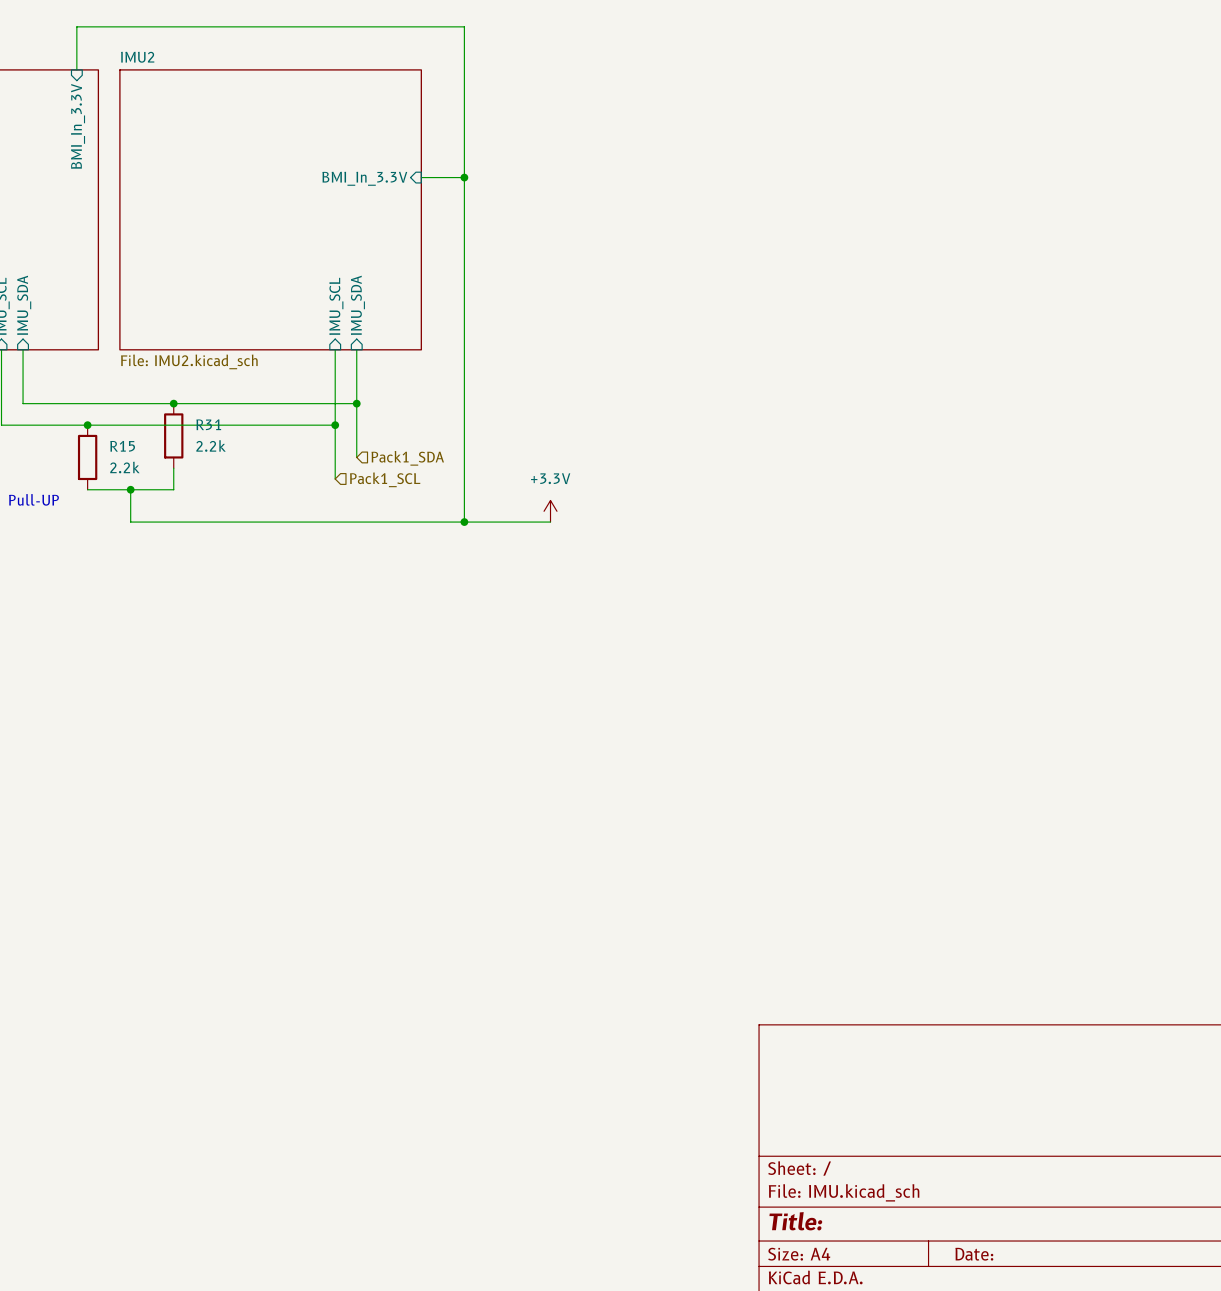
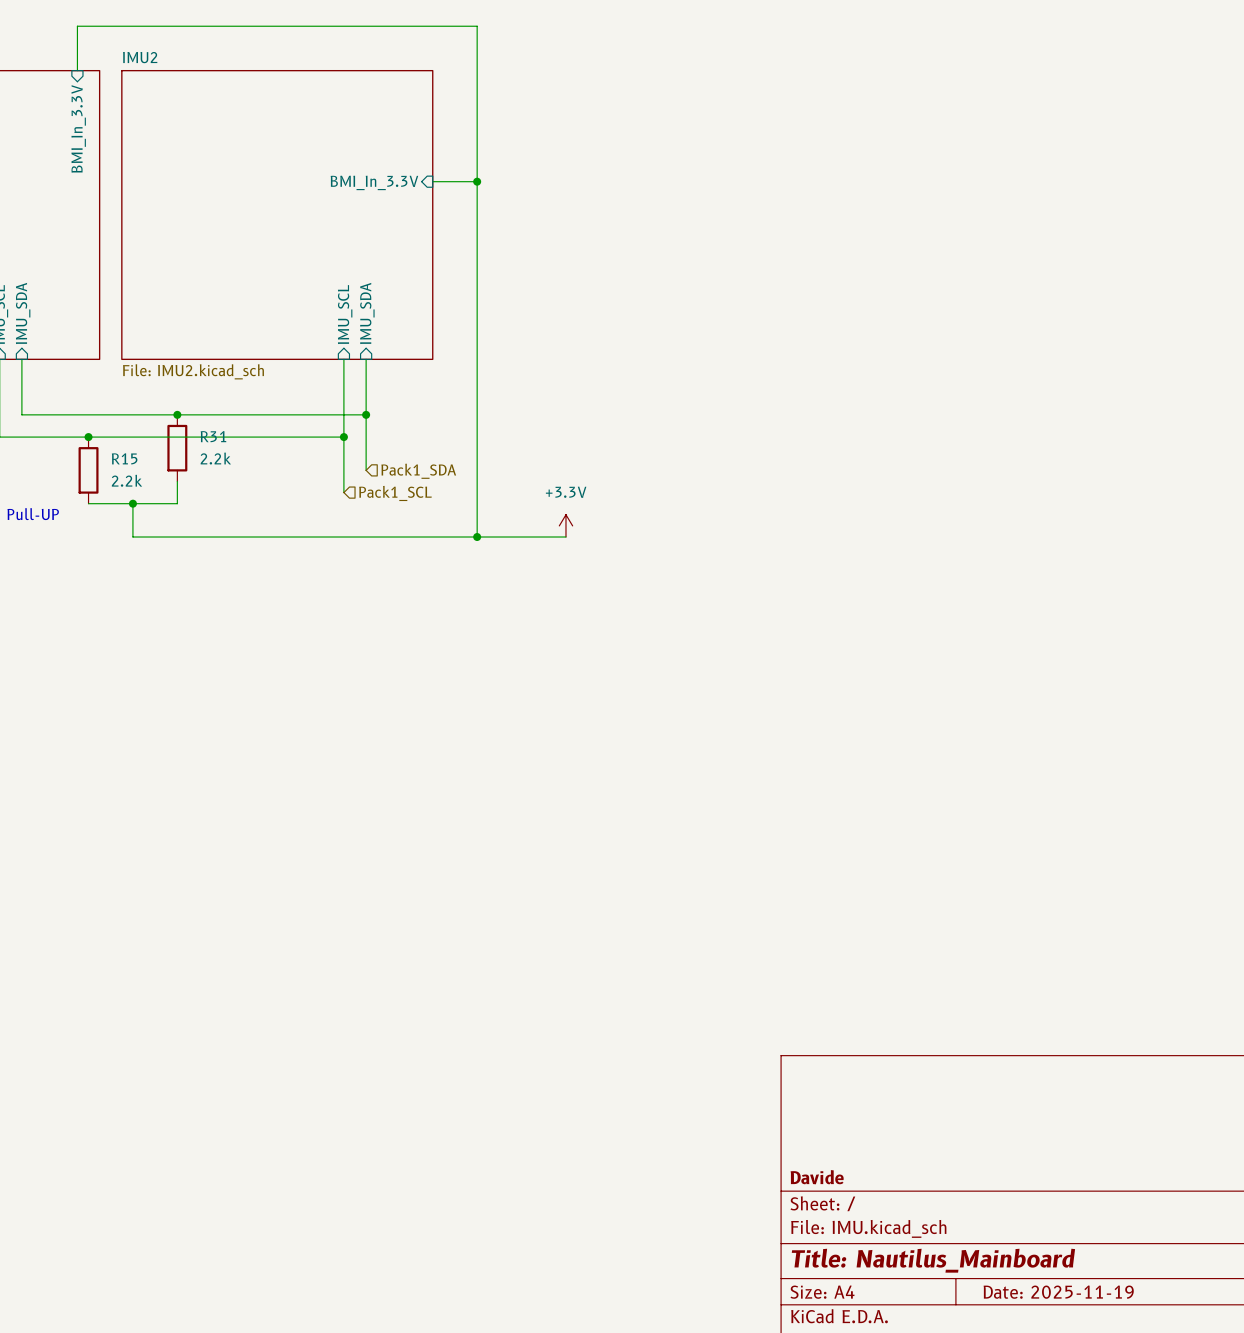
title block: none -> Davide (817, 1177)
title block: Title: (795, 1221) -> Title: Nautilus_Mainboard (933, 1260)
title block: Date: (974, 1254) -> Date: 2025-11-19 (1058, 1292)

